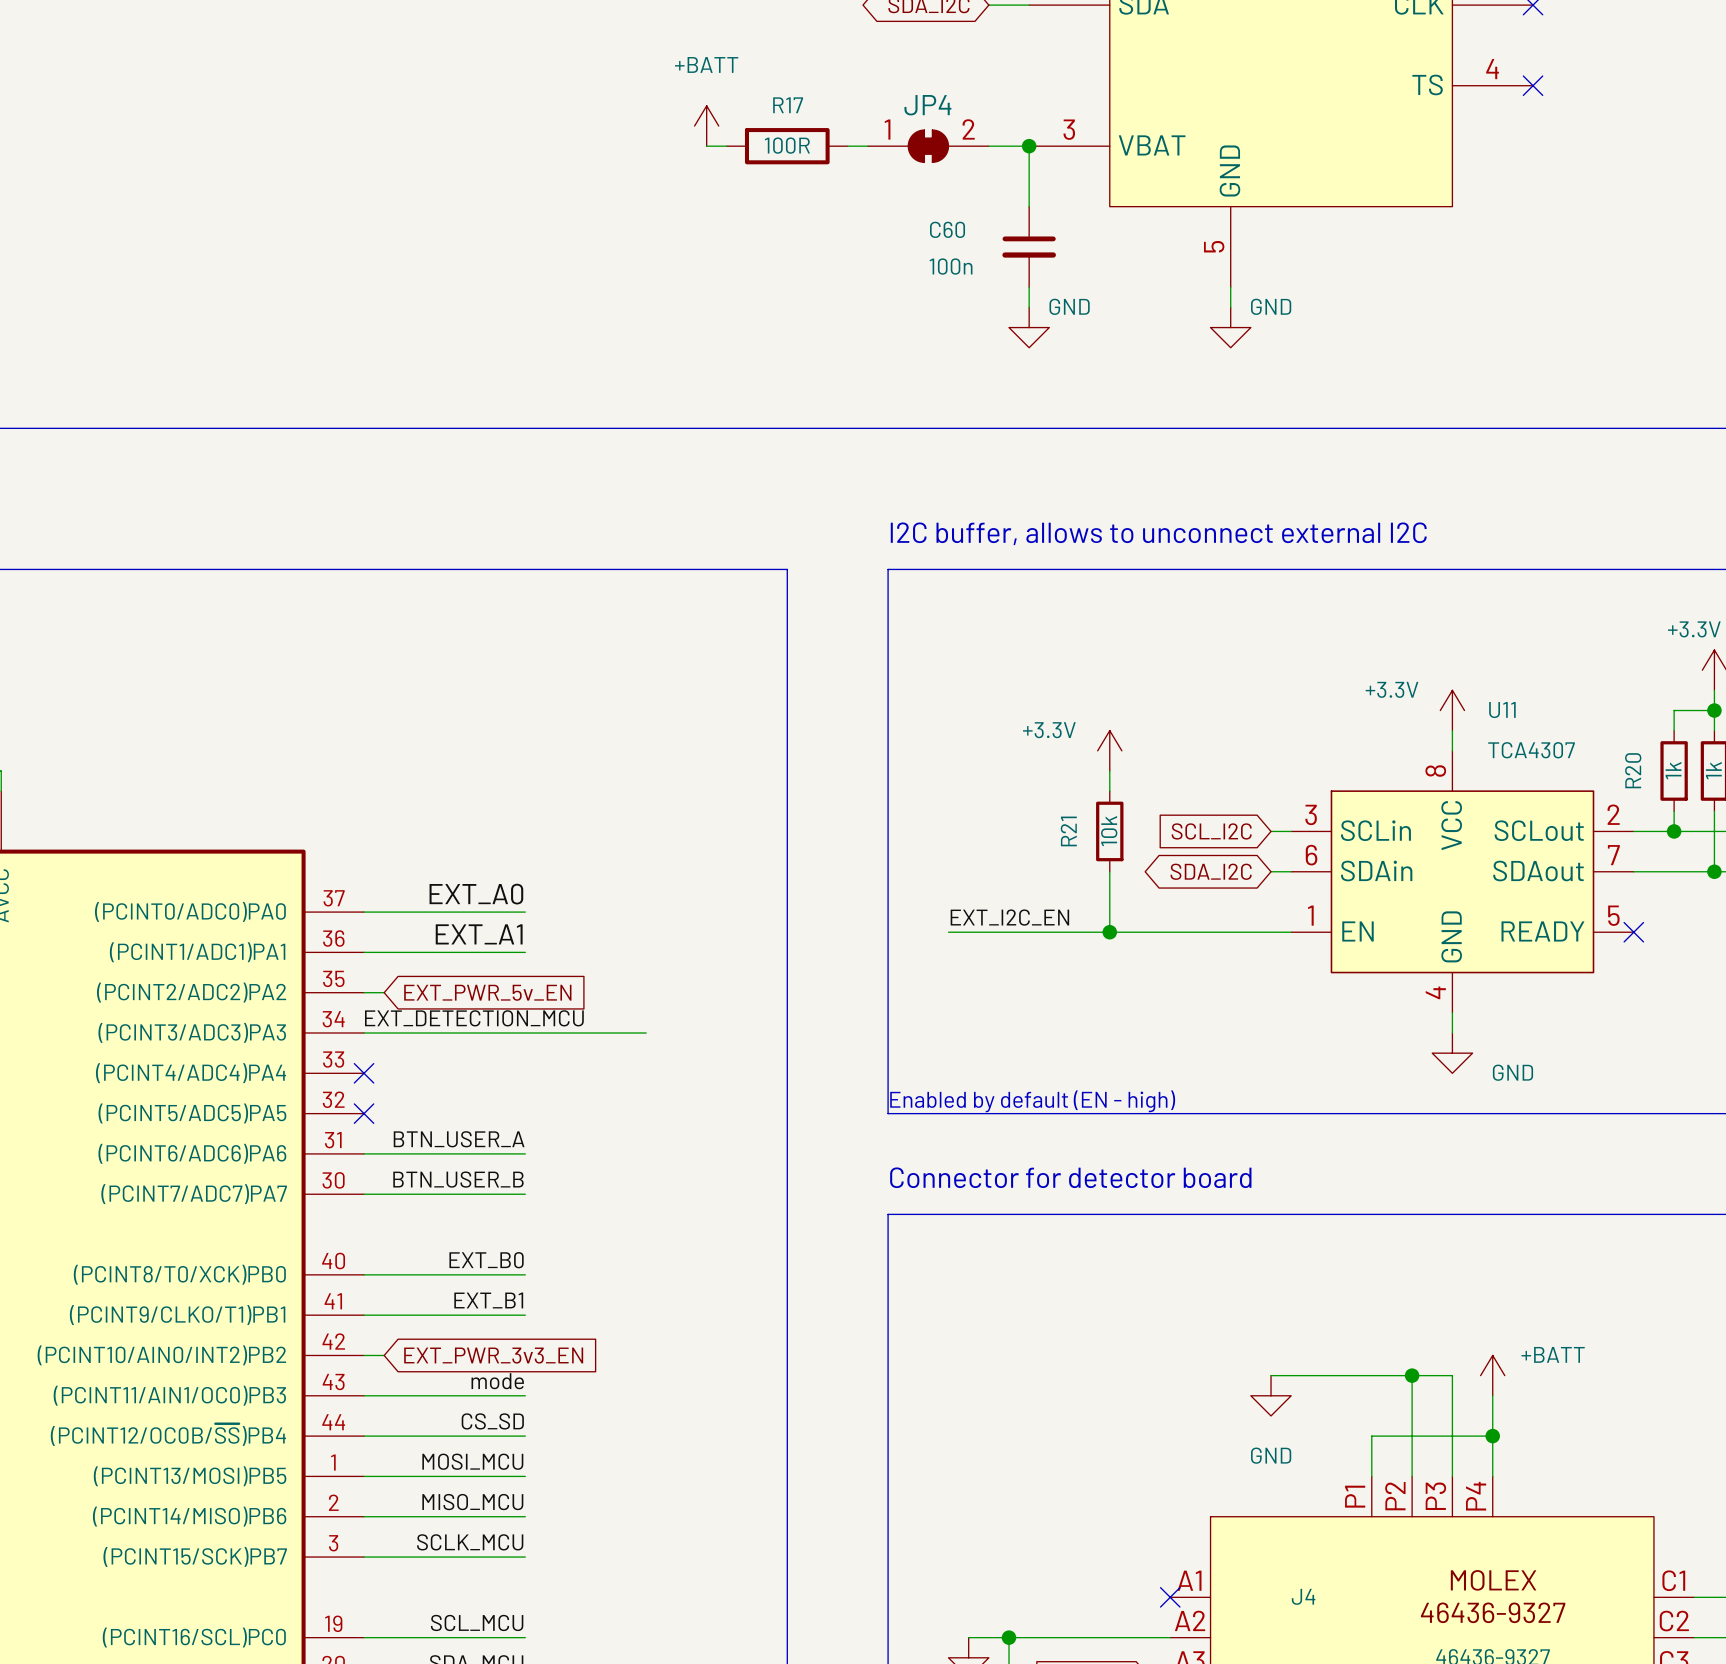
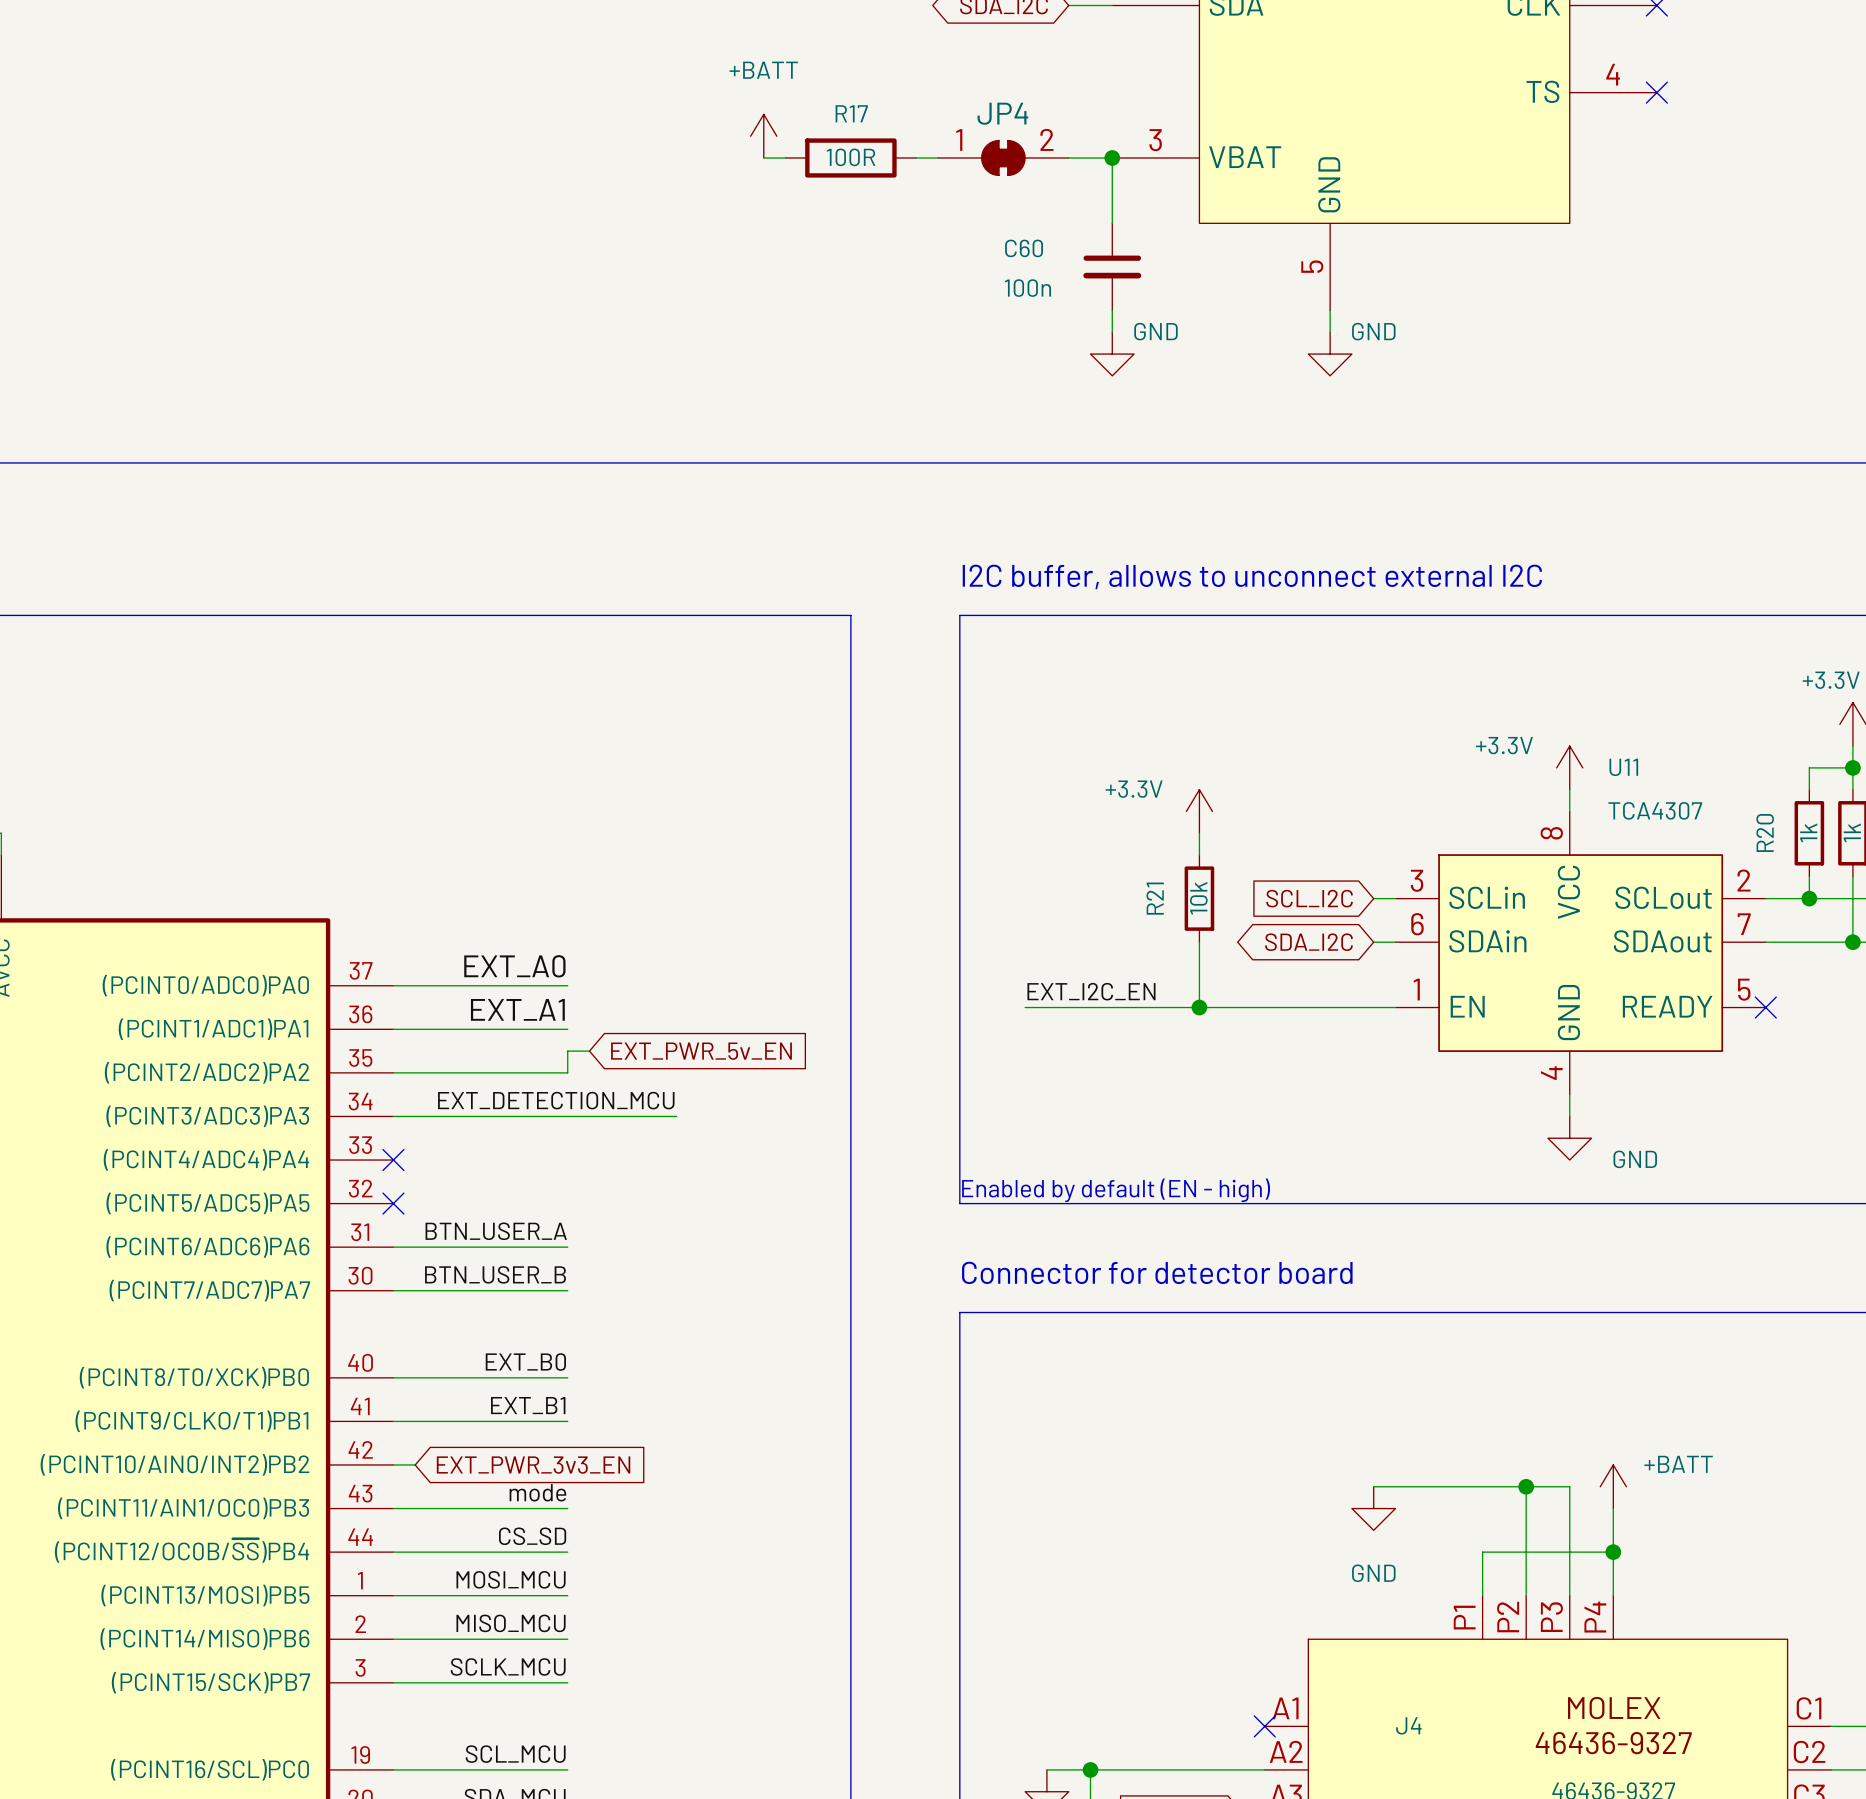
wire: none -> (589, 1051) (567, 1051) (567, 1072) (415, 1072)
global label position: EXT_PWR_5v_EN (487, 992) -> EXT_PWR_5v_EN (701, 1051)
label position: EXT_DETECTION_MCU (474, 1018) -> EXT_DETECTION_MCU (556, 1100)
wire: (626, 1033) (646, 1033) -> none

